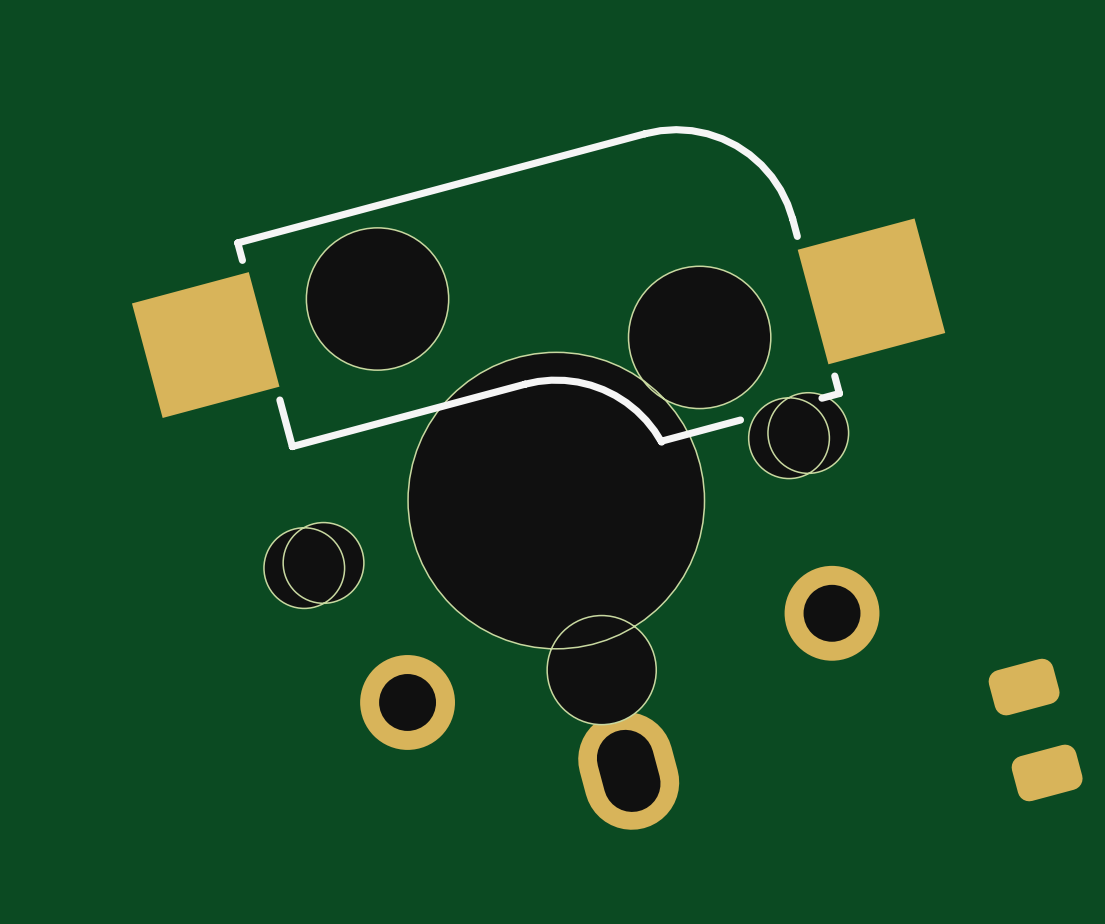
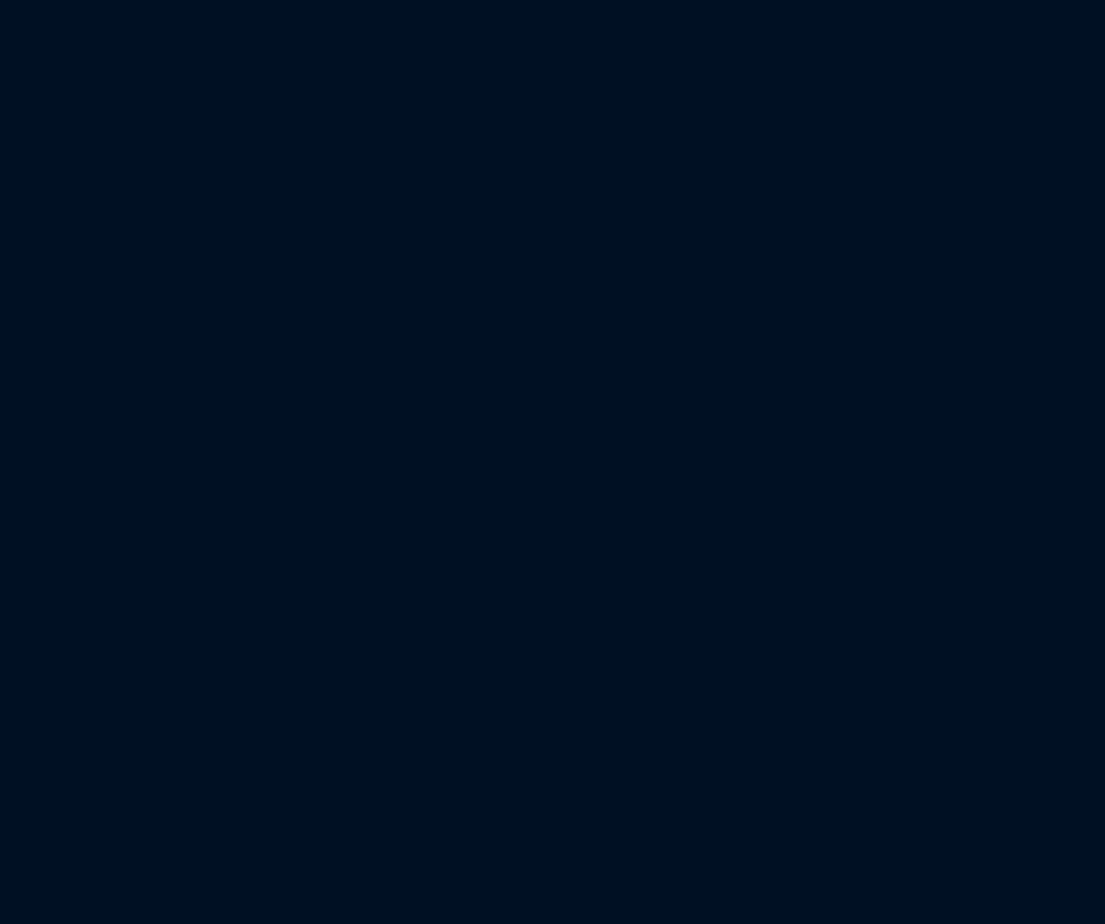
part: (607, 477) -> none

